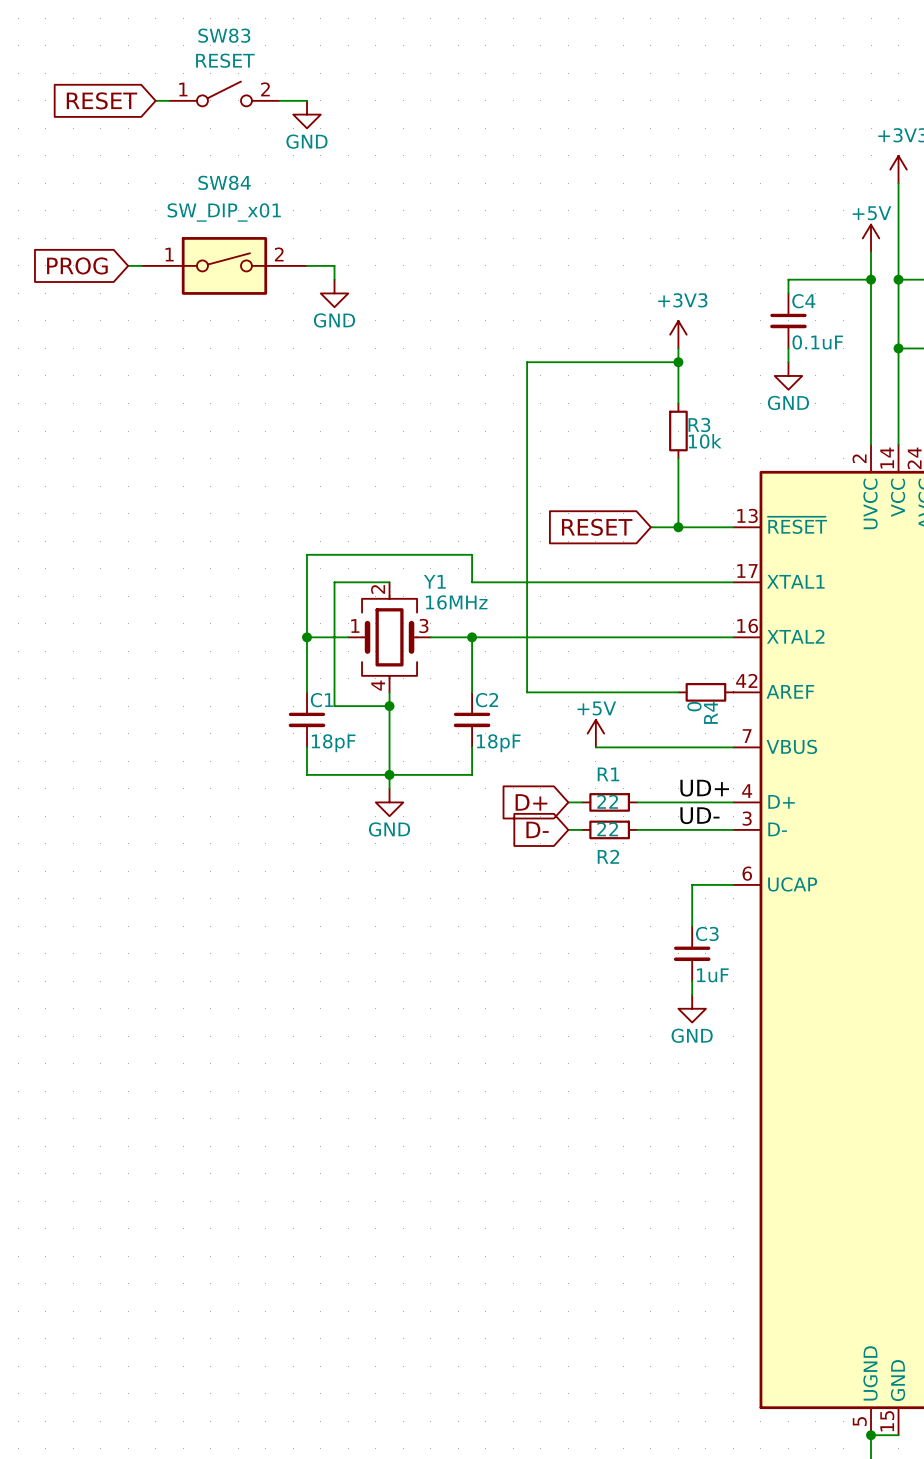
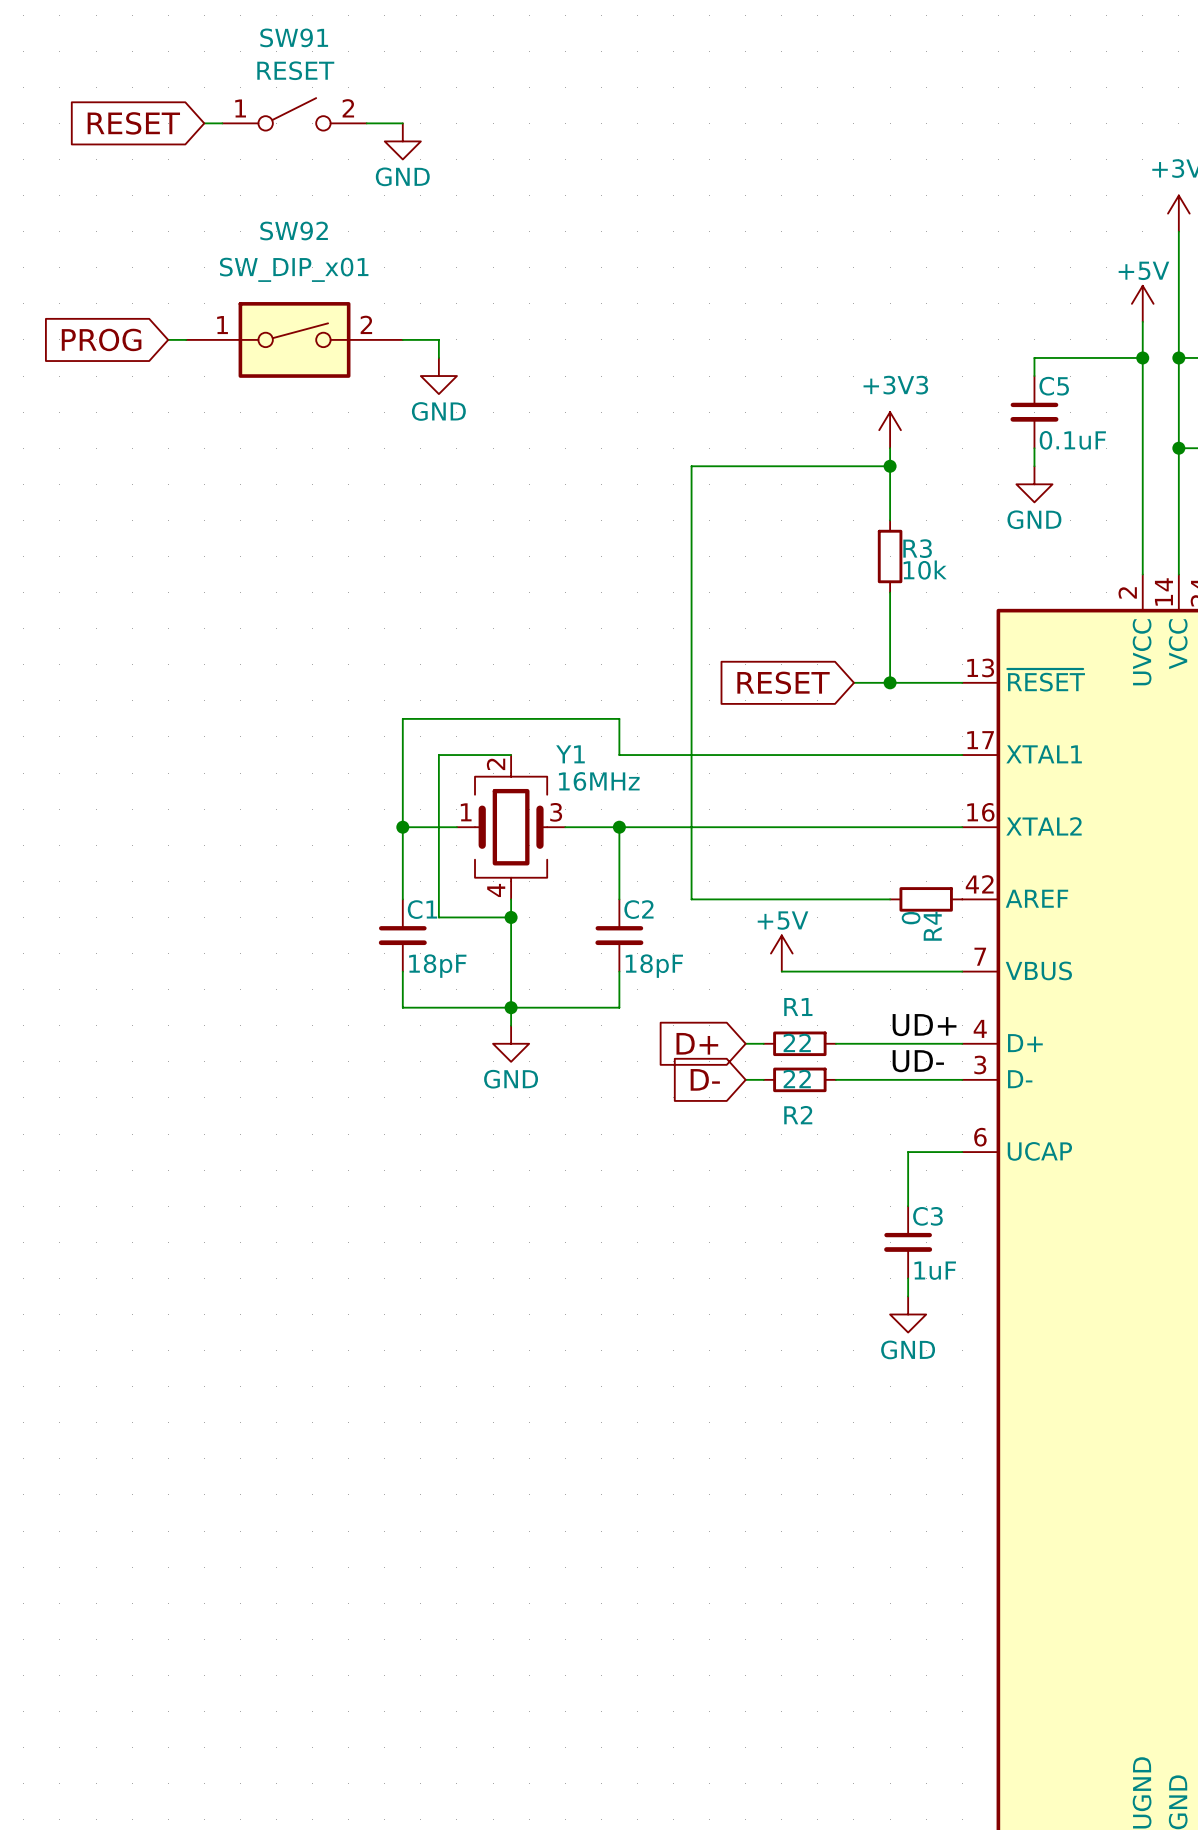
SW83 name: SW83 (224, 35) -> SW91 (294, 37)
SW84 name: SW84 (224, 182) -> SW92 (294, 230)
C4 name: C4 (803, 301) -> C5 (1054, 386)

